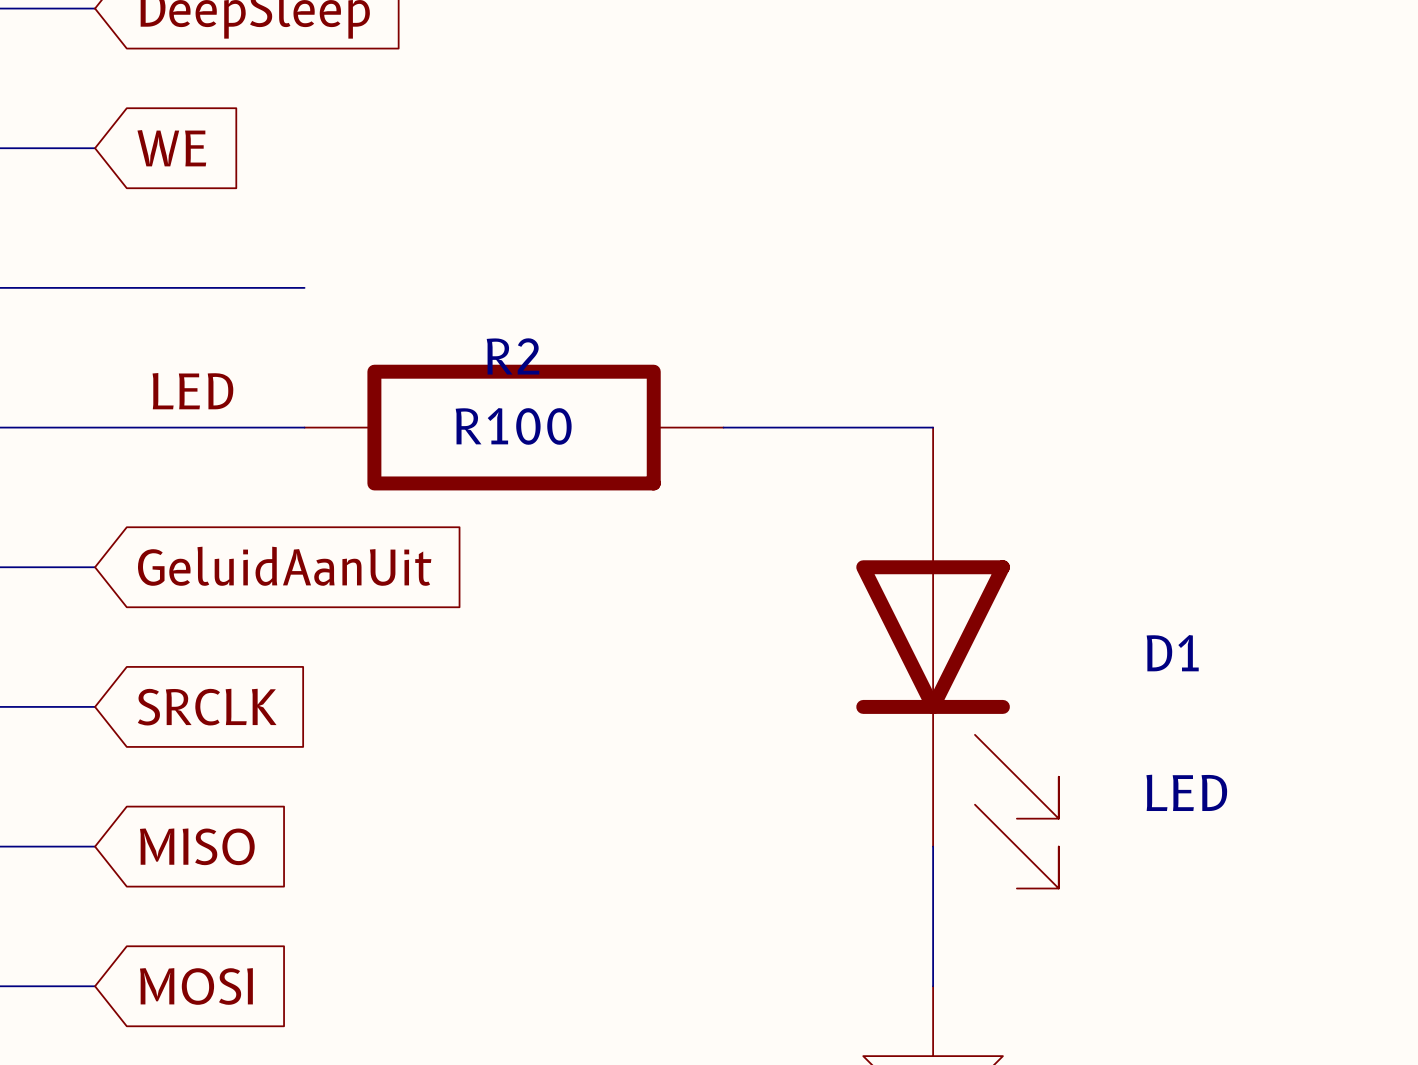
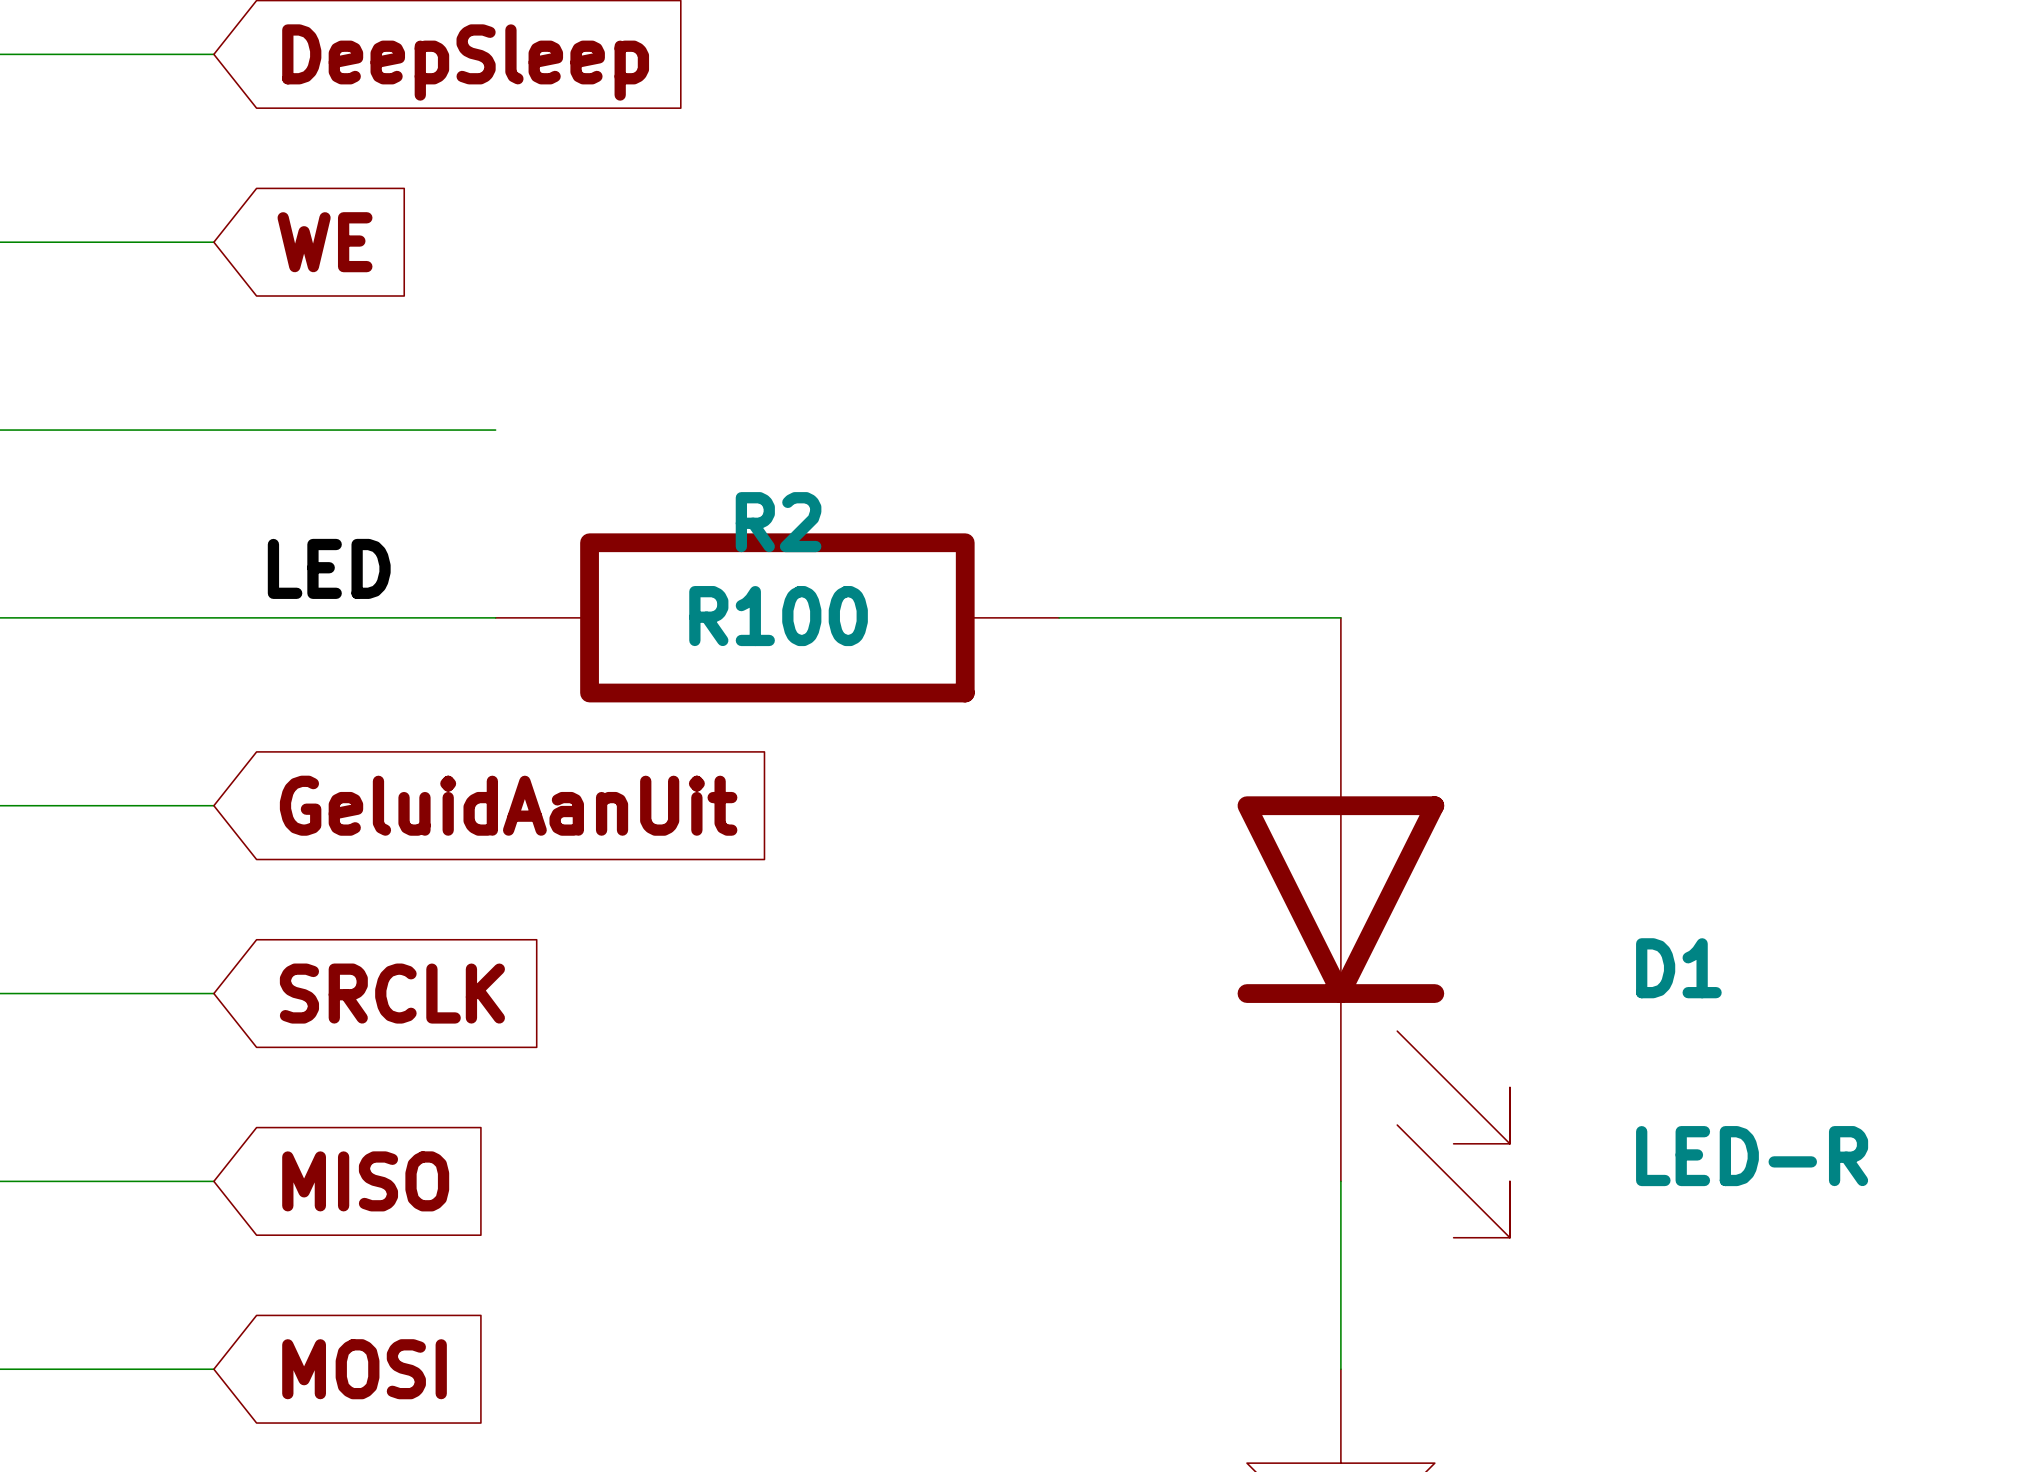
D1 name position: D1 (1172, 653) -> D1 (1678, 968)
D1 value: LED (1186, 792) -> LED-R (1752, 1156)

